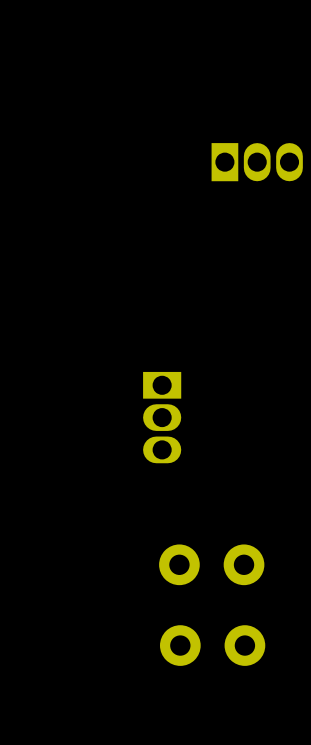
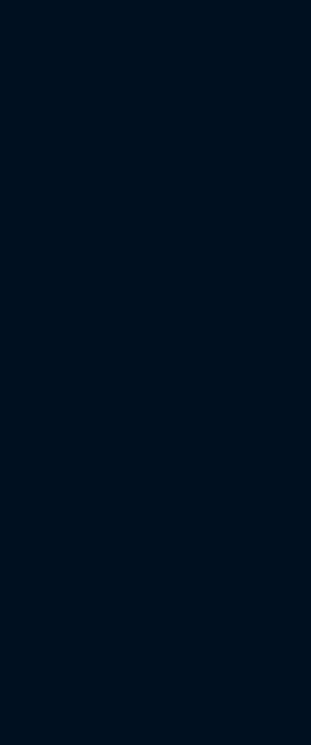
part: (257, 162) -> none
part: (162, 417) -> none
part: (211, 564) -> none
part: (212, 645) -> none

